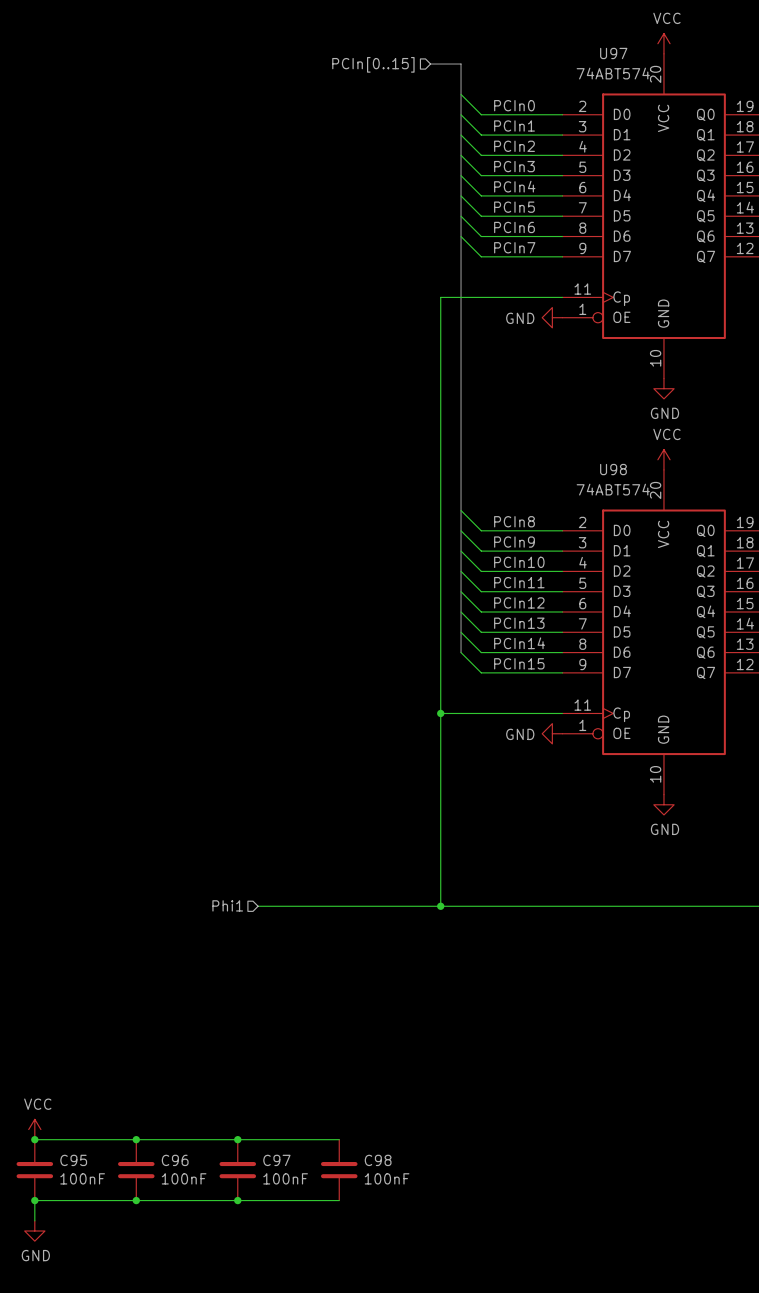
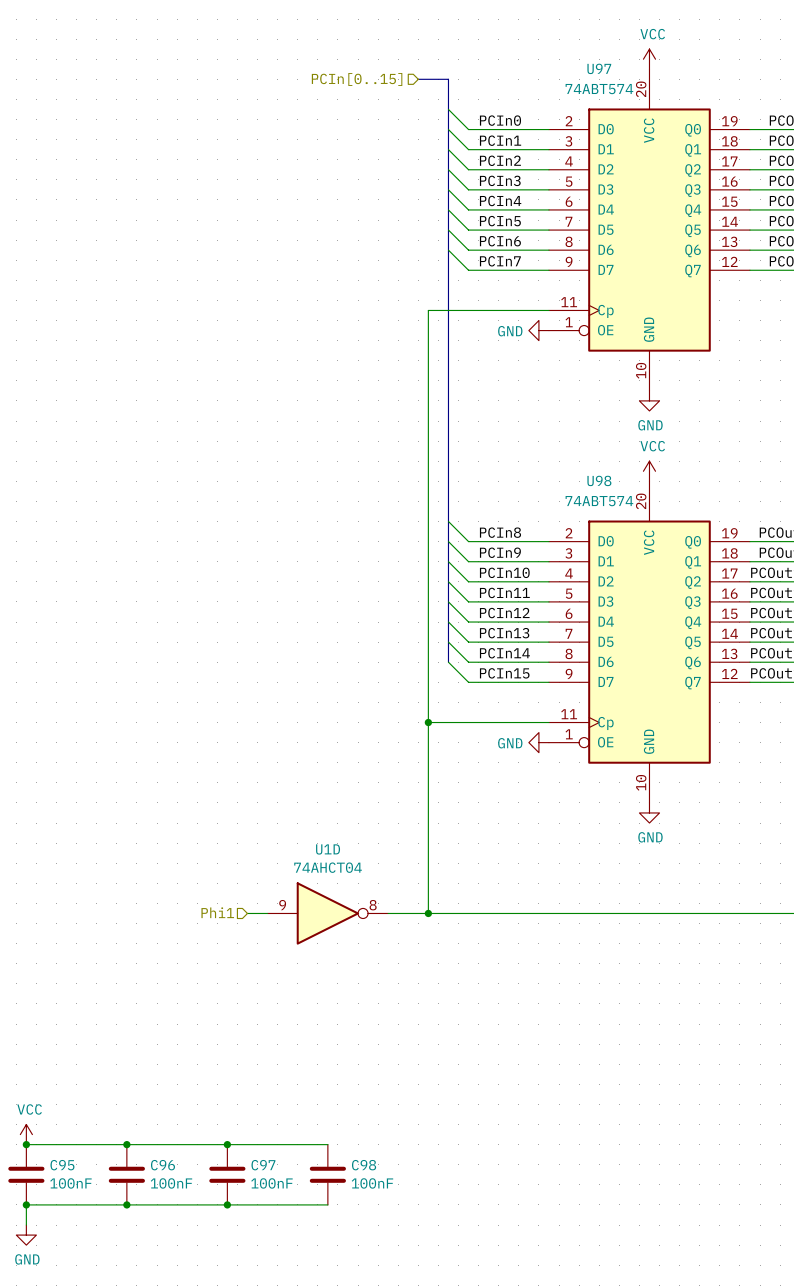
U1D: none -> 74AHCT04 (327, 913)

